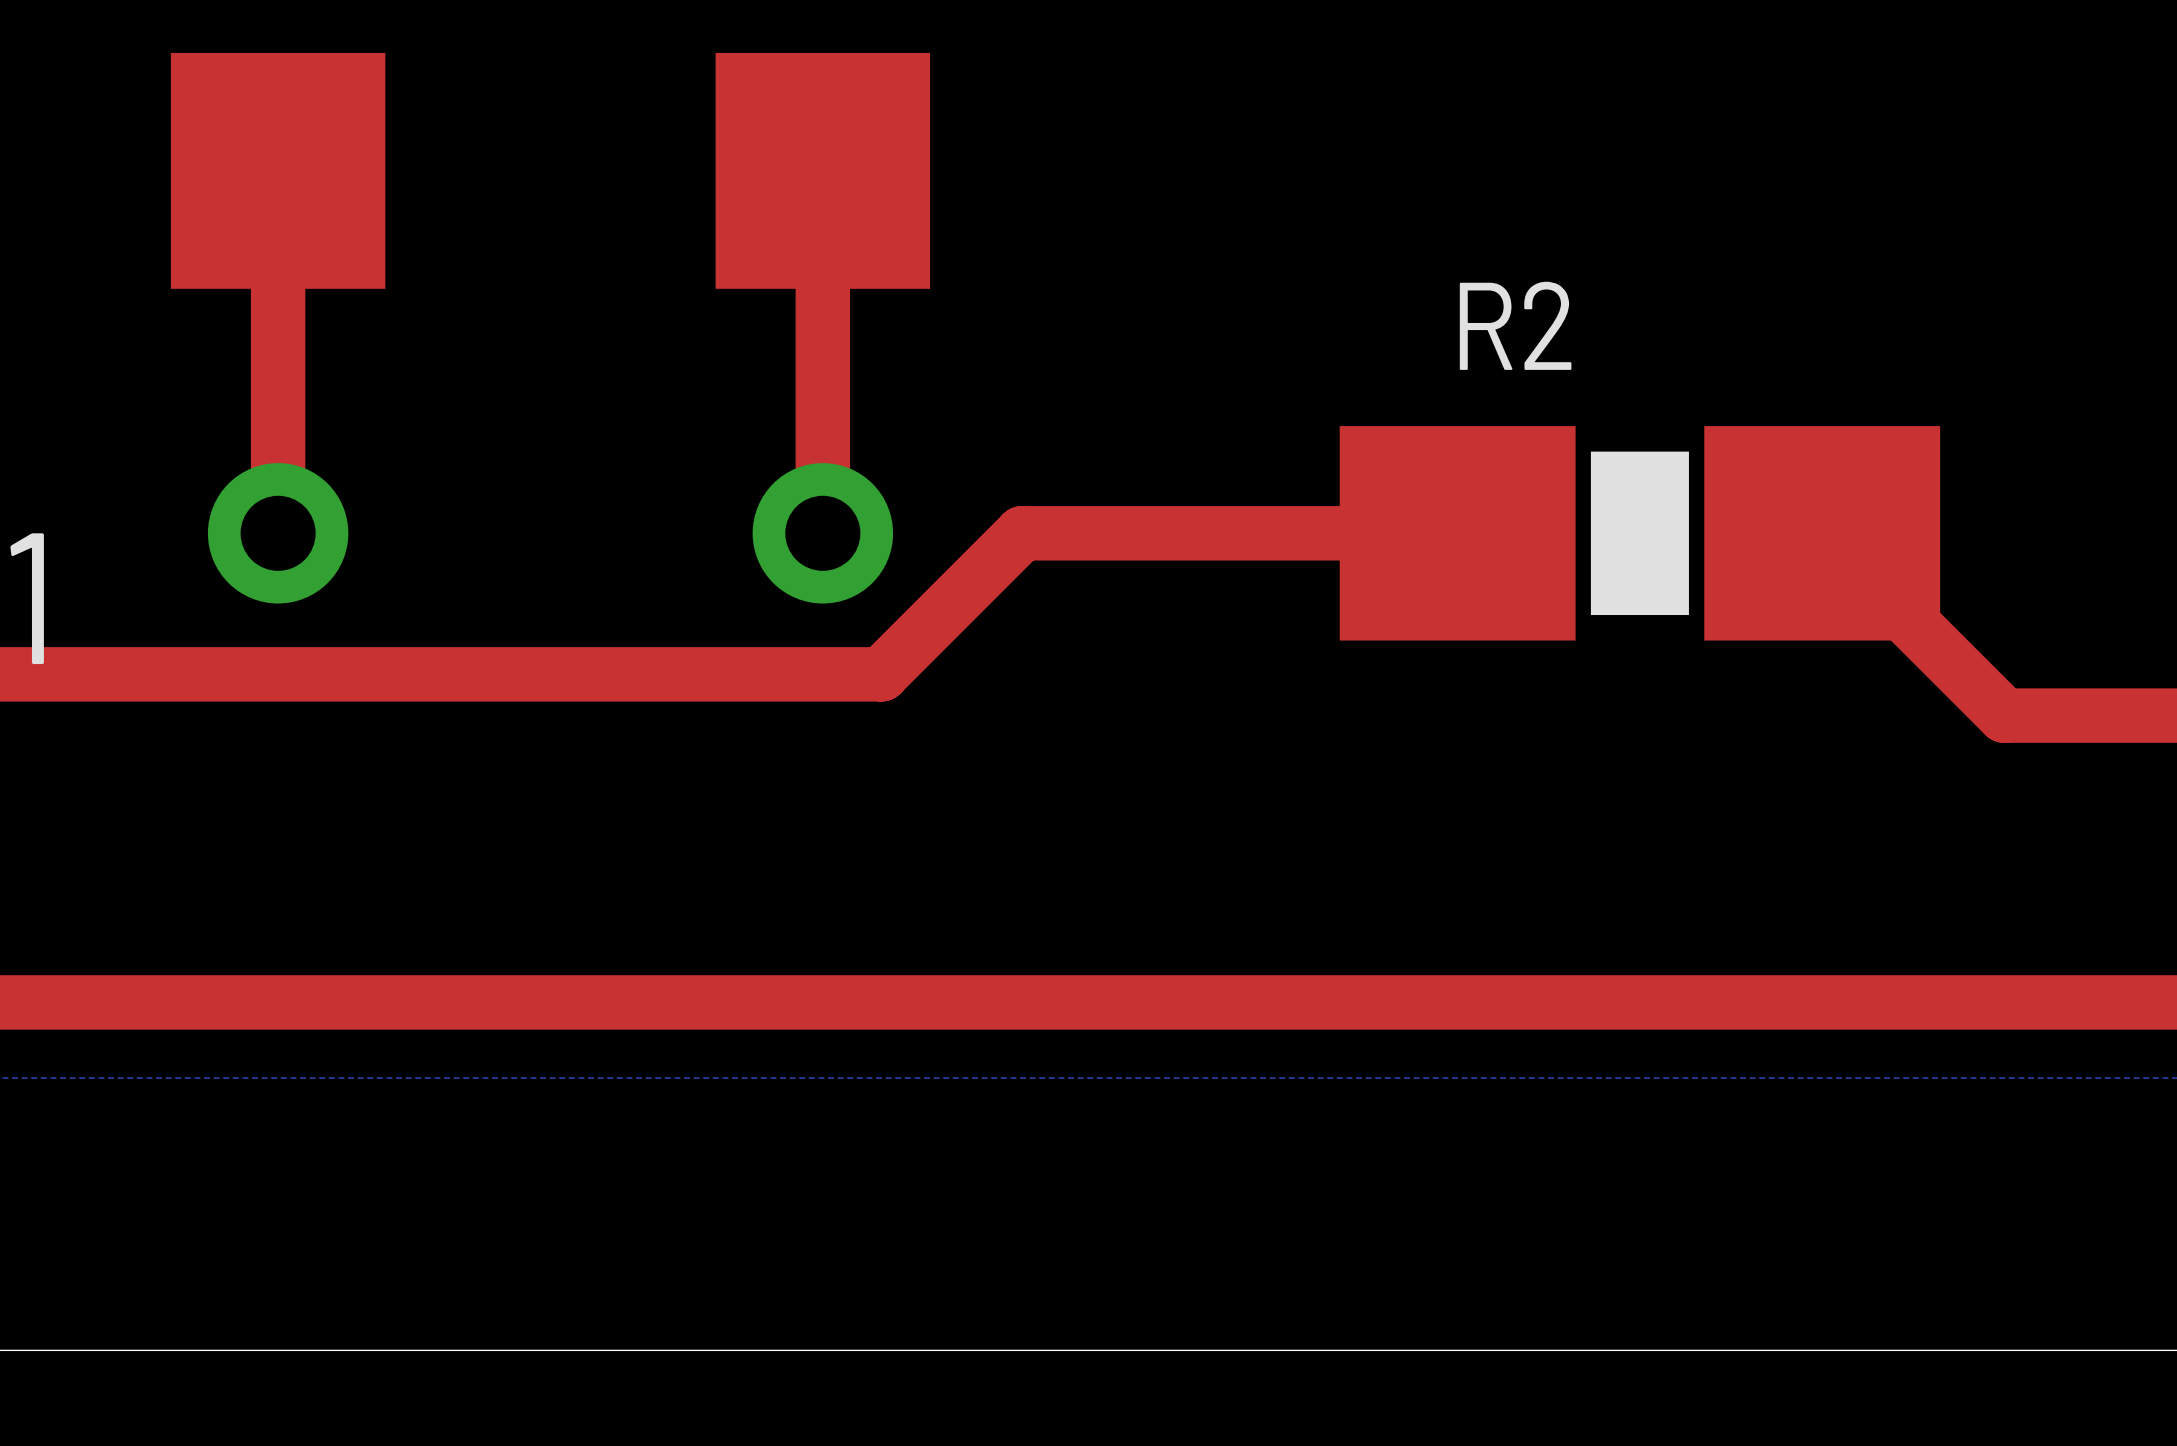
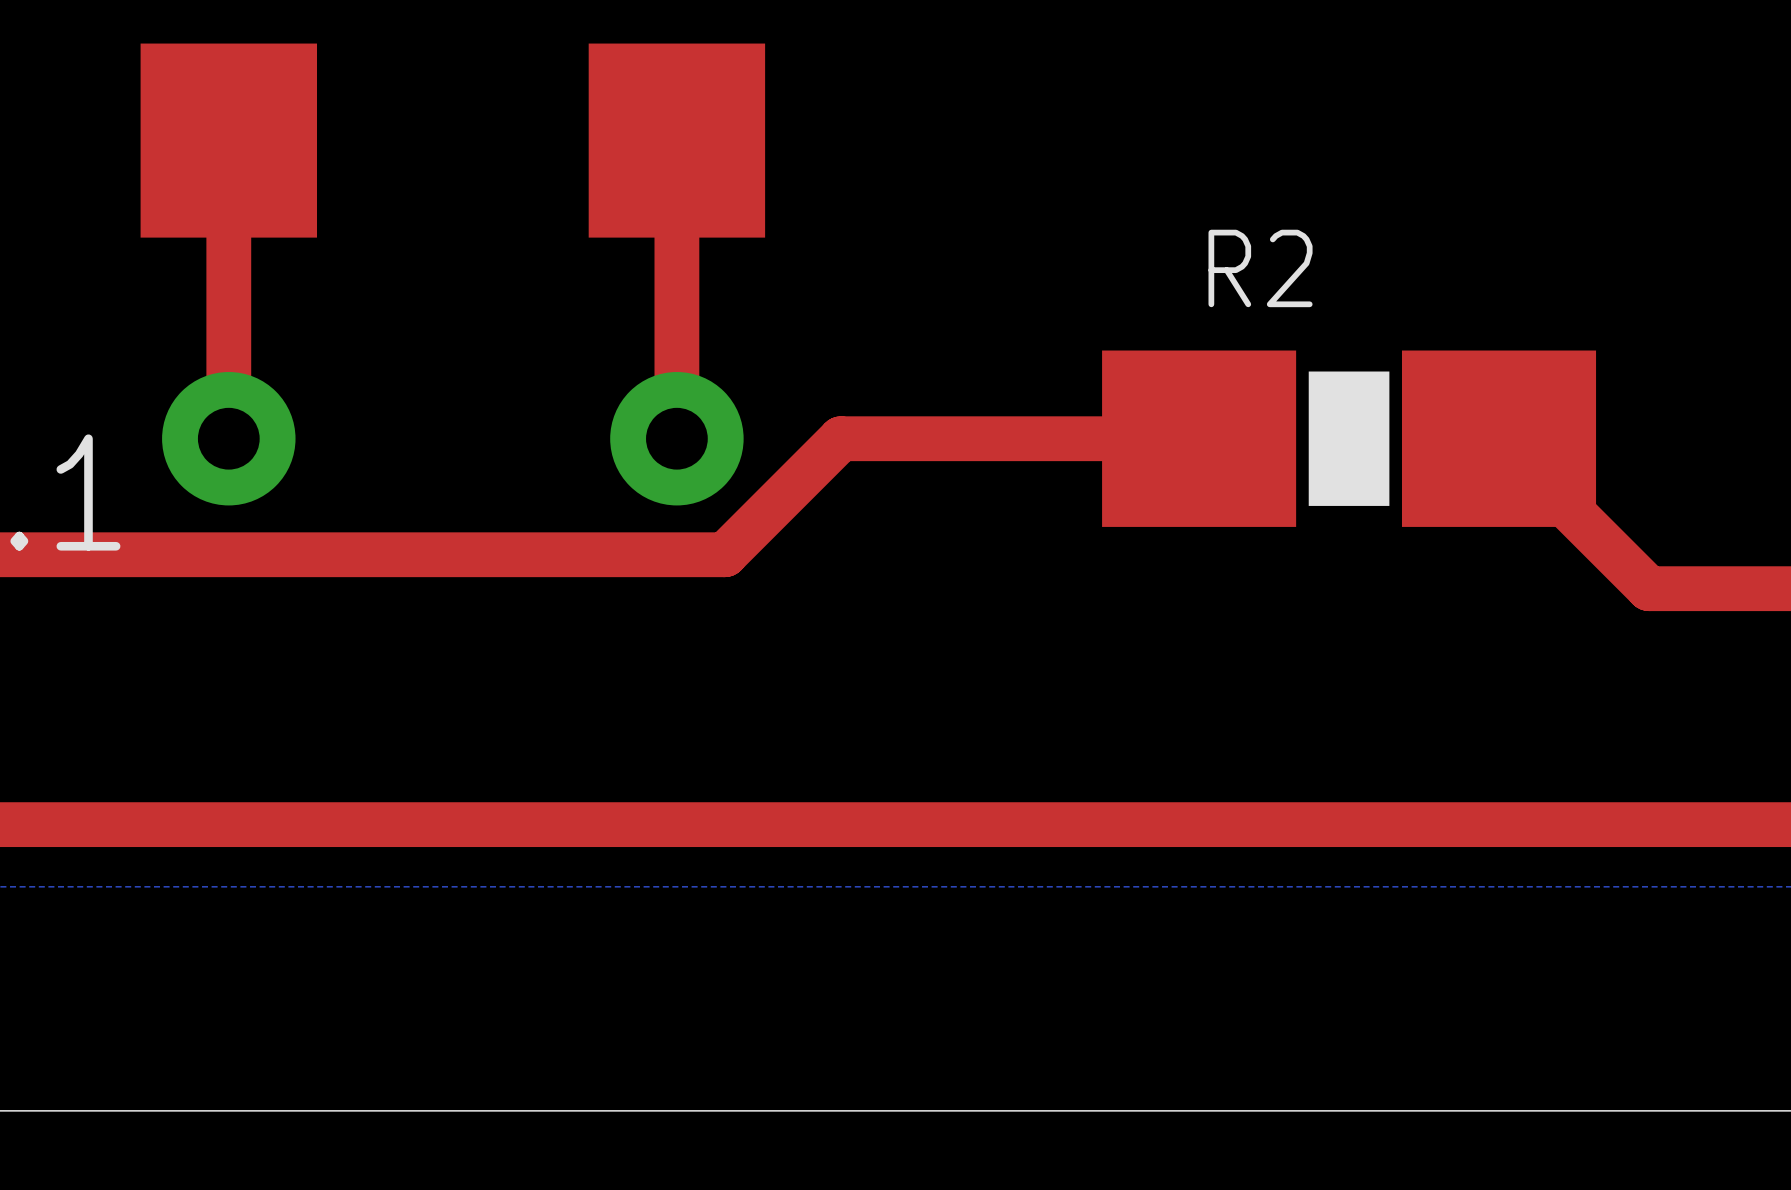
via size: [207, 463, 349, 604] -> [162, 372, 296, 506]
via size: [752, 463, 894, 604] -> [610, 372, 744, 506]

